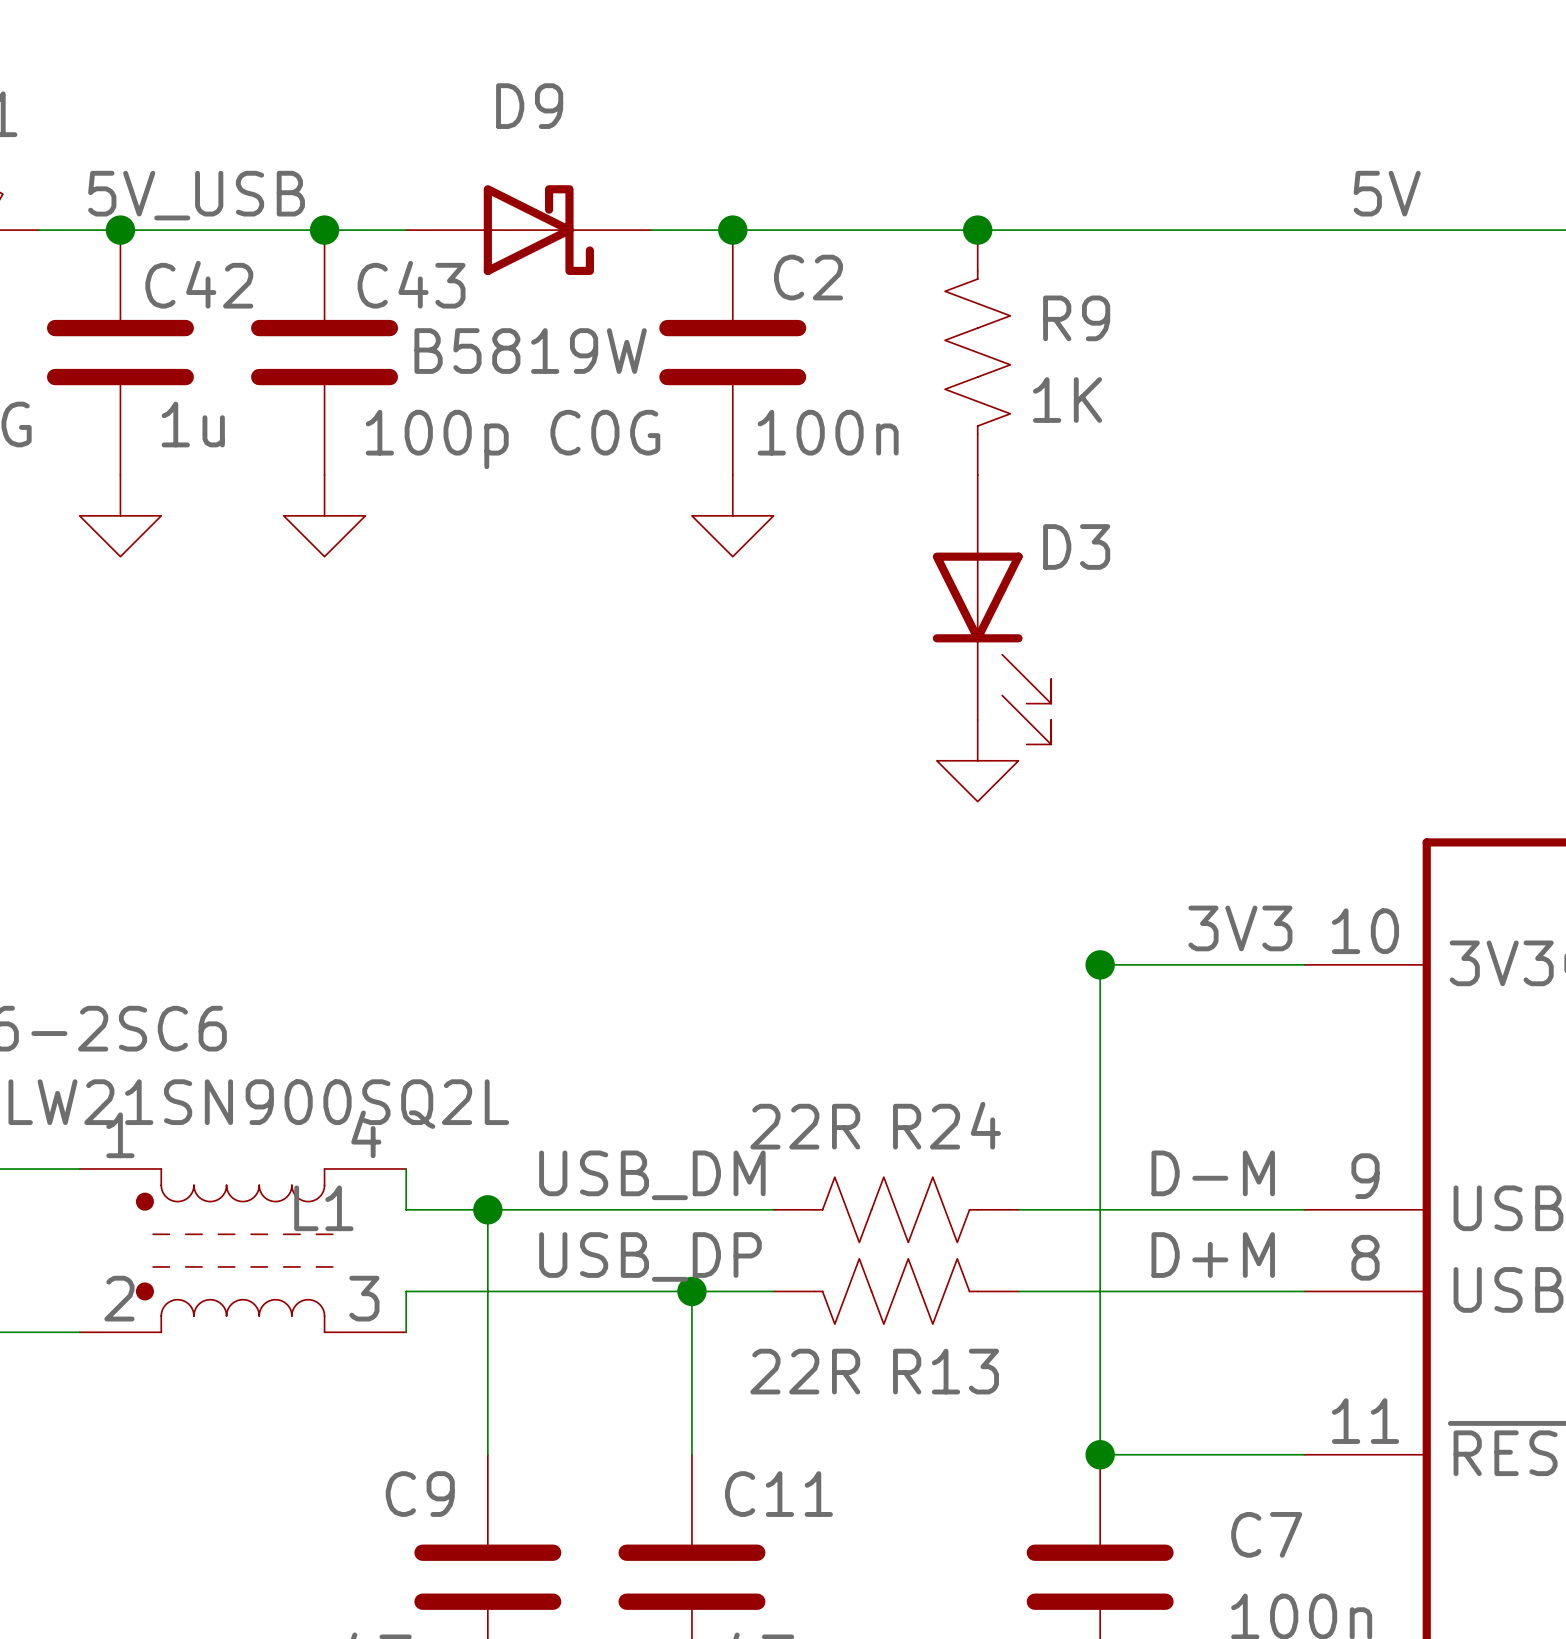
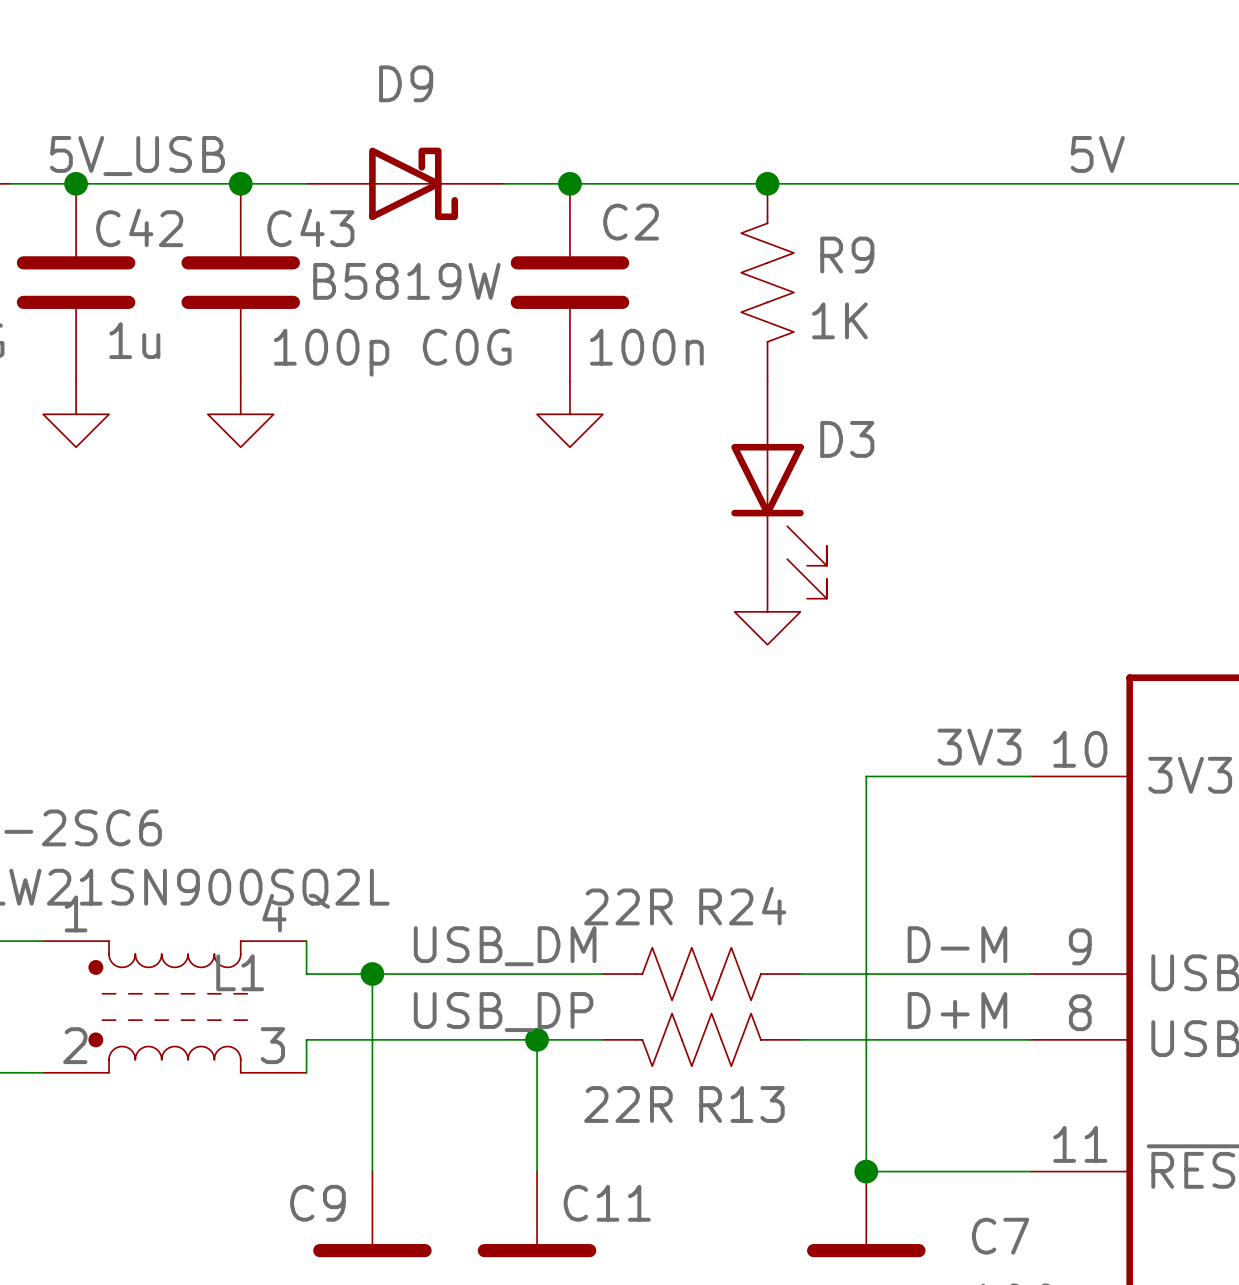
junction: (1100, 964) -> none

